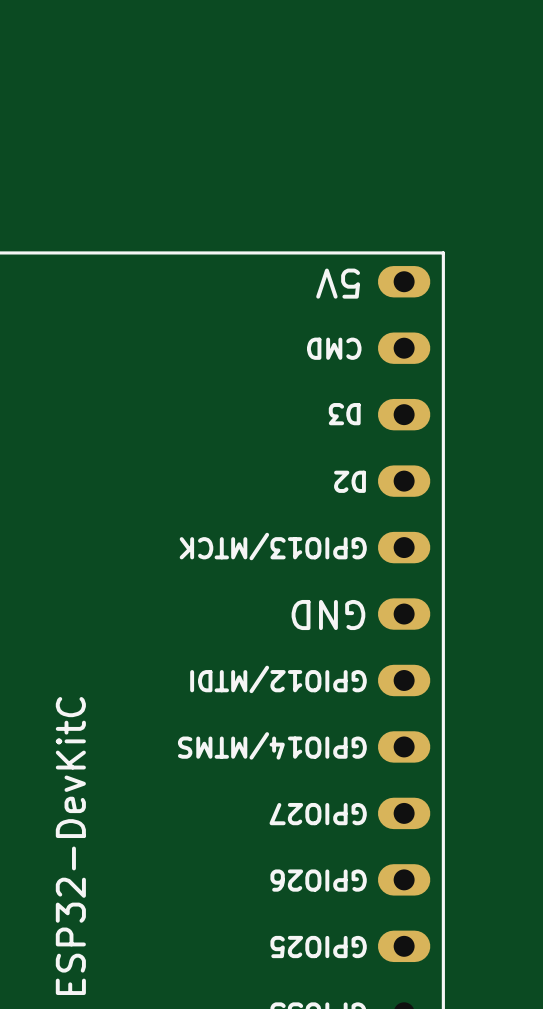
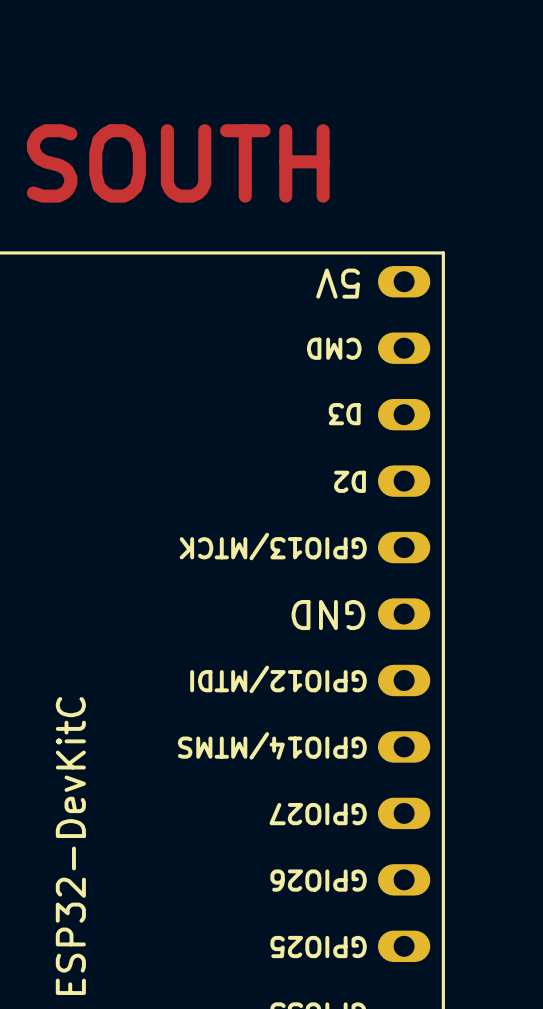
text: none -> SOUTH (178, 163)

